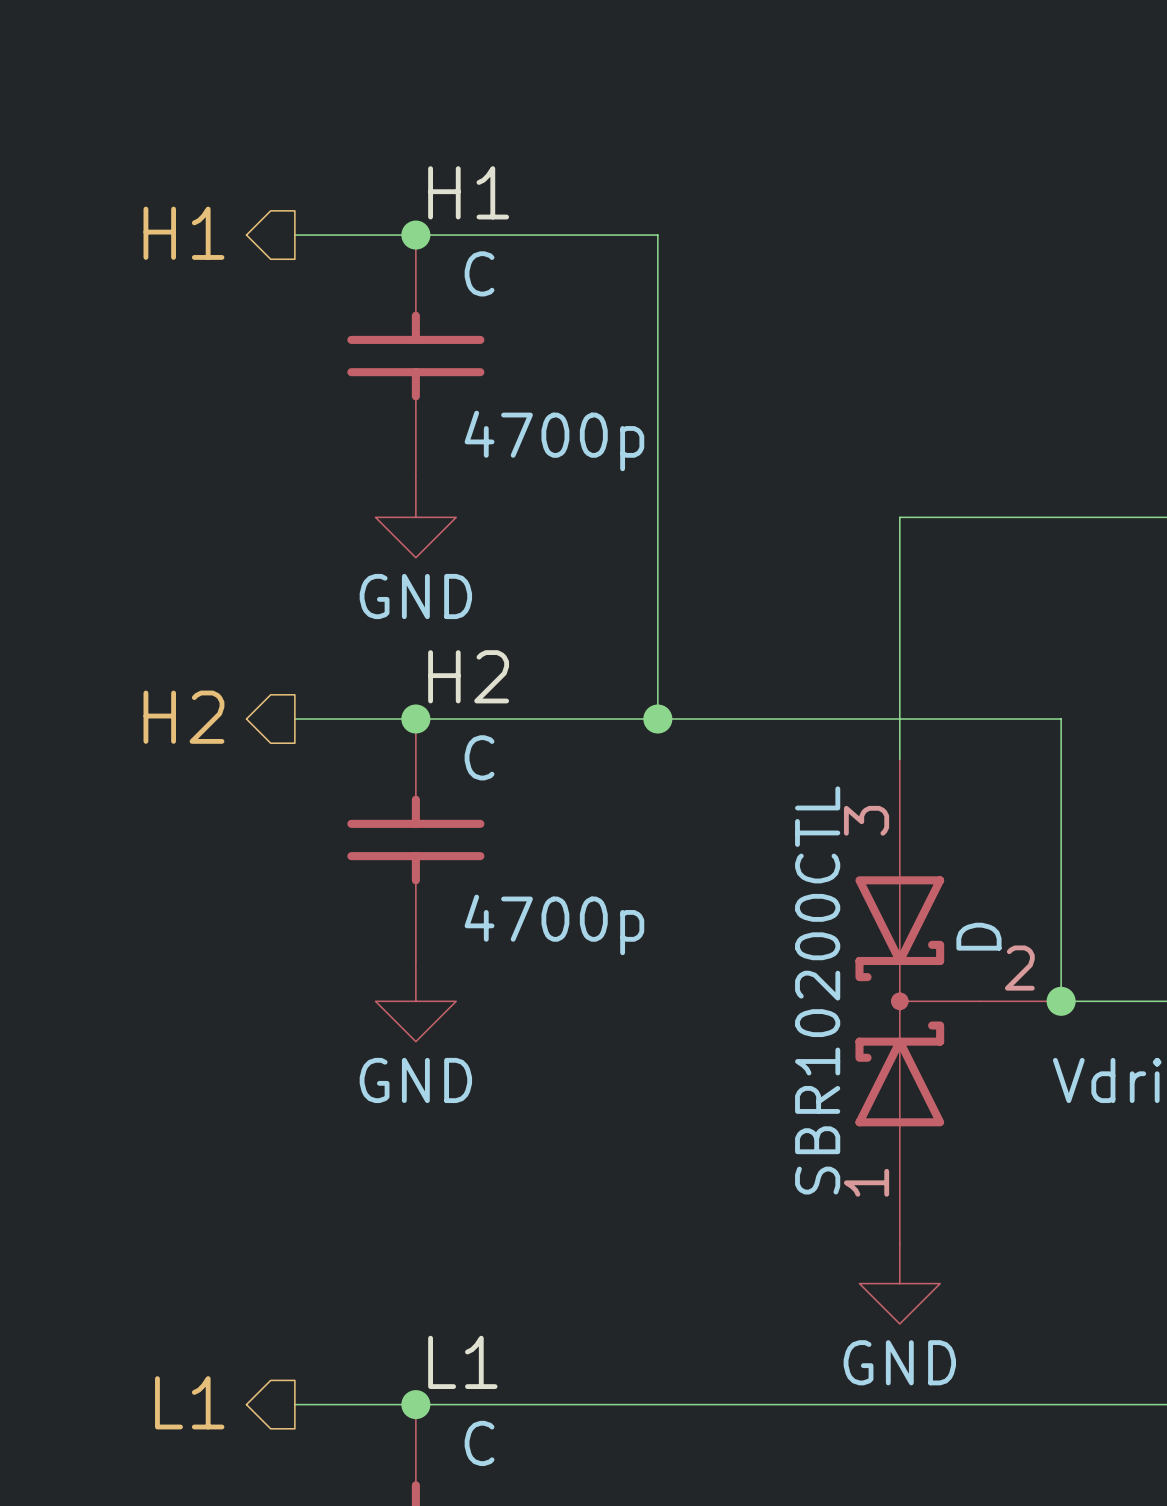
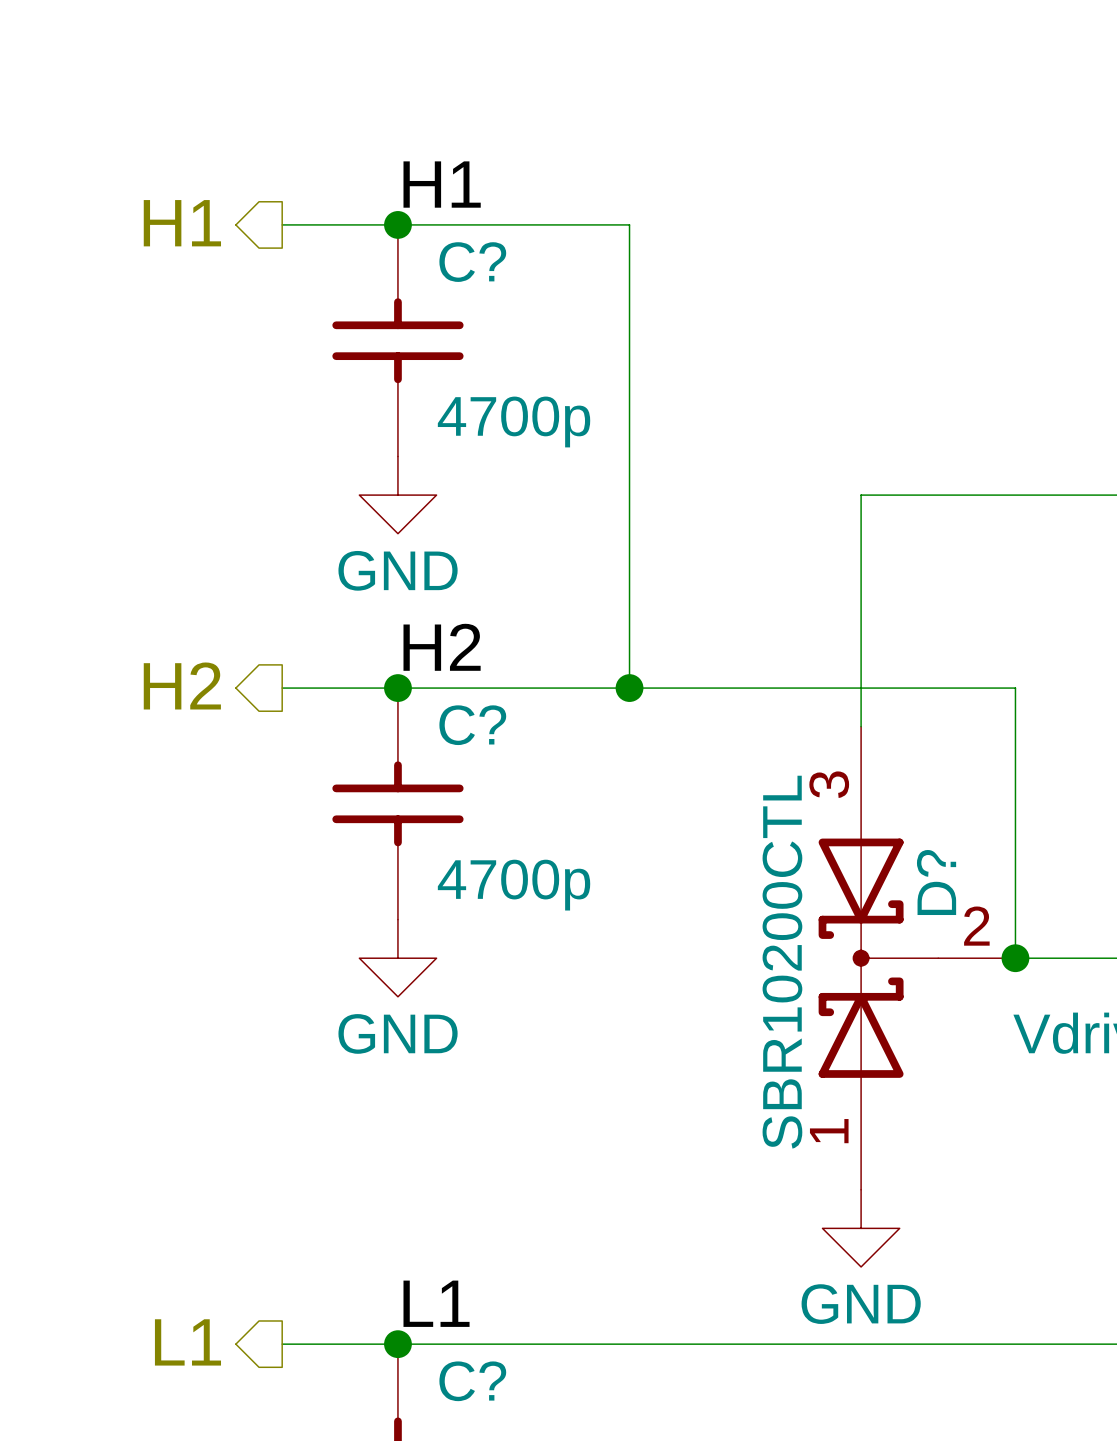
C name: C (479, 273) -> C? (472, 262)
C name: C (479, 757) -> C? (472, 725)
D name: D (978, 936) -> D? (936, 882)
C name: C (479, 1443) -> C? (472, 1381)

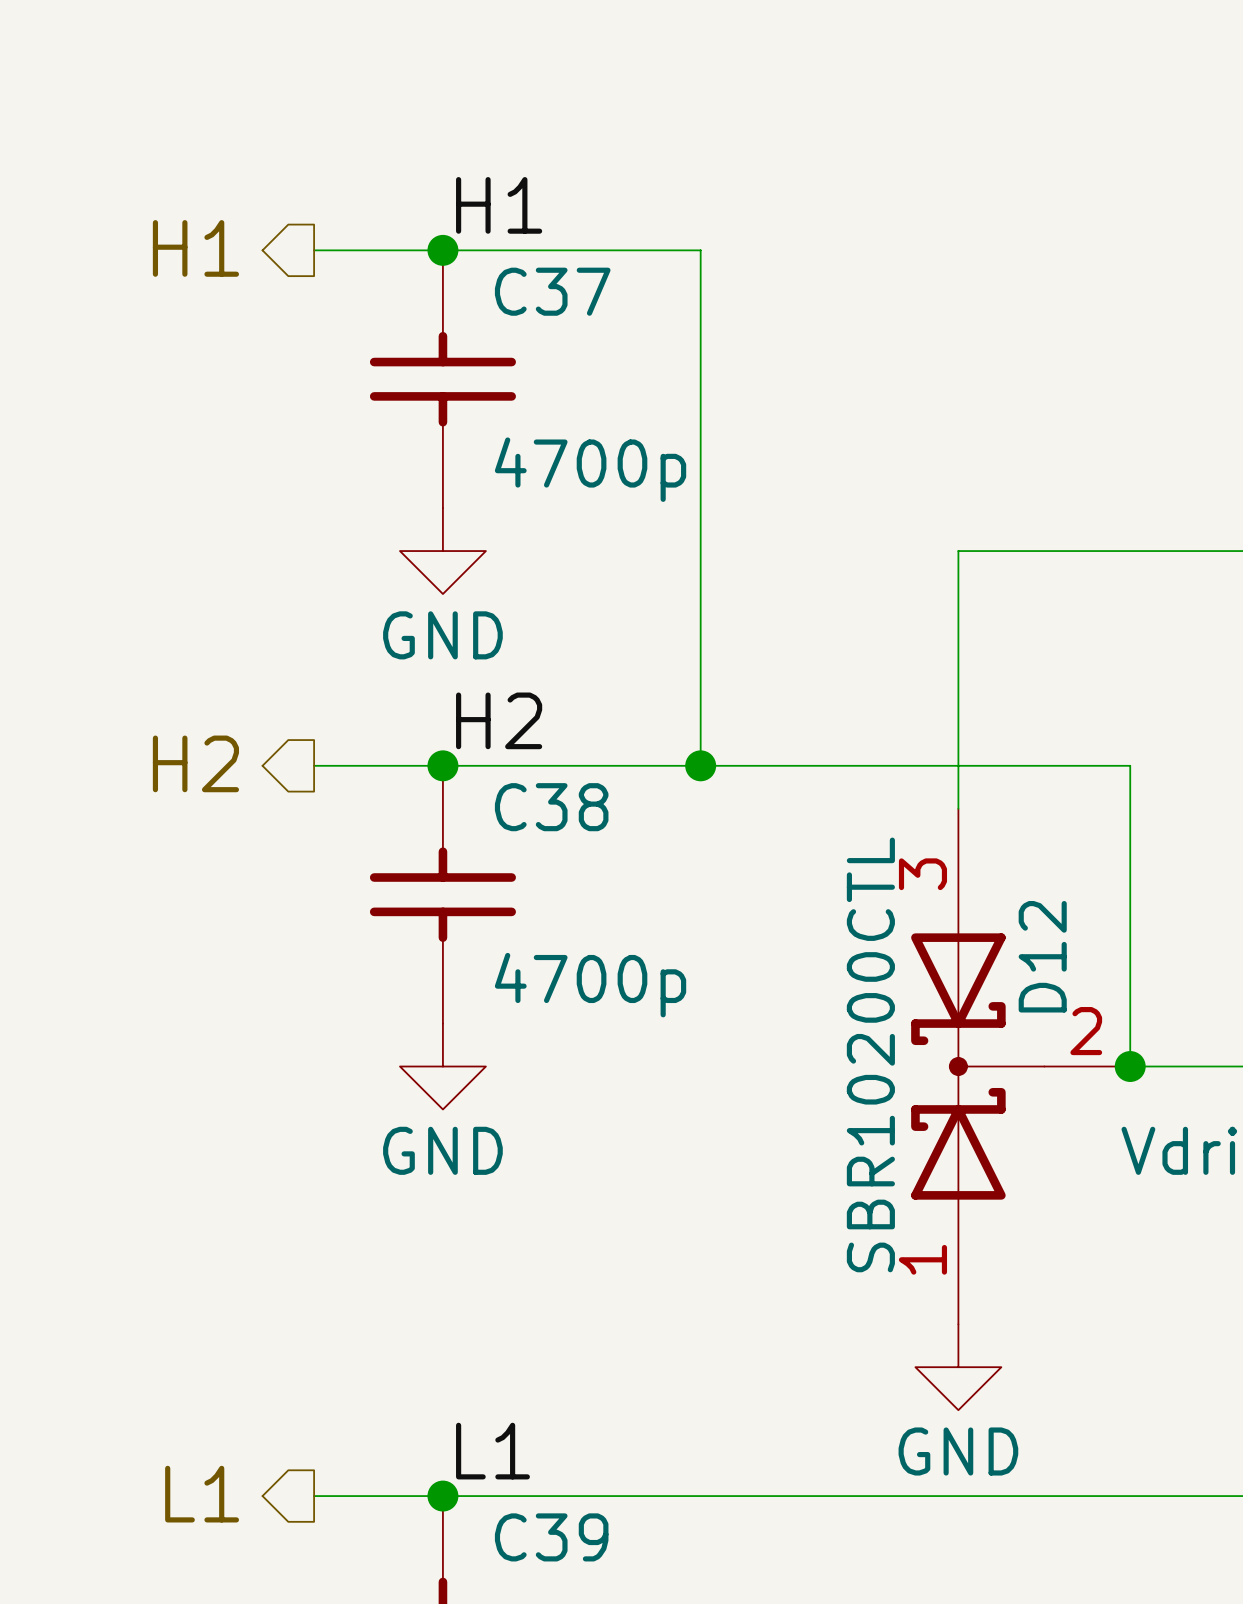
C? name: C? (472, 262) -> C37 (552, 291)
C? name: C? (472, 725) -> C38 (551, 807)
D? name: D? (936, 882) -> D12 (1042, 956)
C? name: C? (472, 1381) -> C39 (551, 1537)

